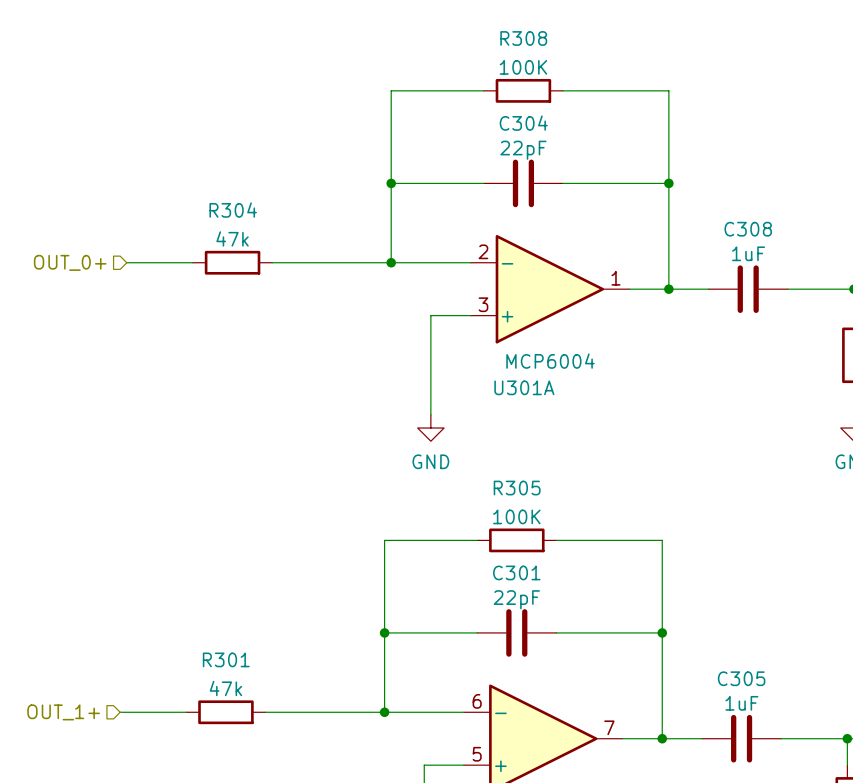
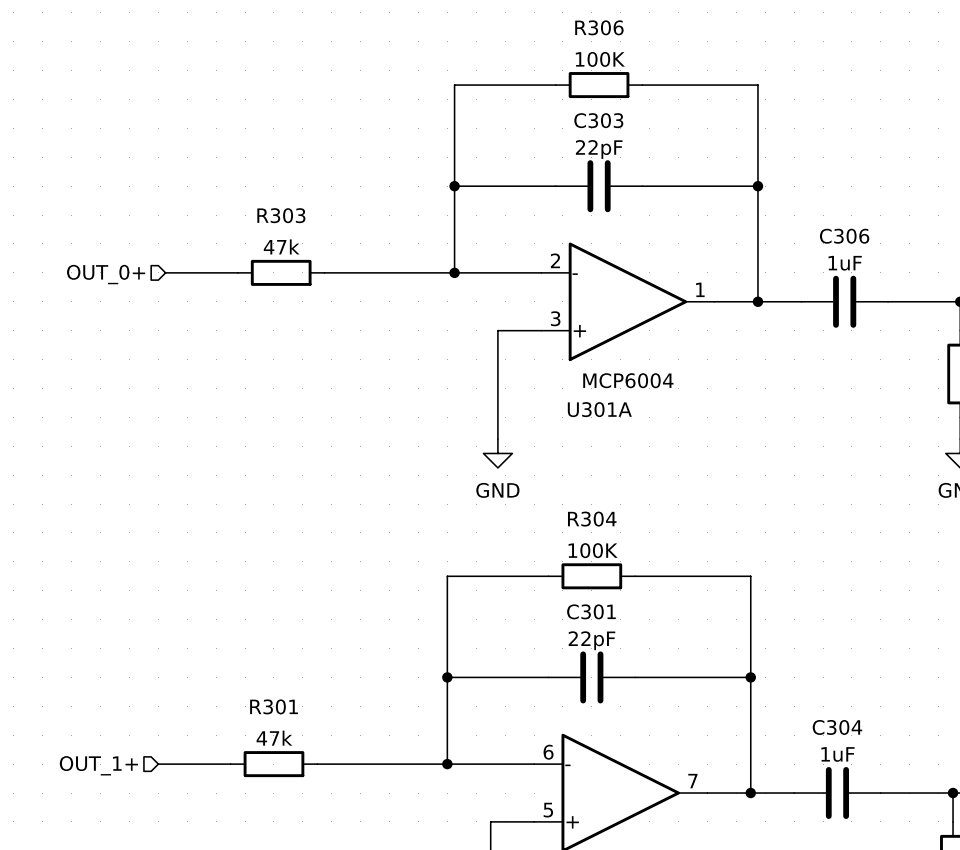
R308 name: R308 (523, 38) -> R306 (599, 27)
C304 name: C304 (523, 123) -> C303 (598, 120)
R304 name: R304 (233, 210) -> R303 (281, 215)
C308 name: C308 (748, 229) -> C306 (844, 236)
R305 name: R305 (517, 488) -> R304 (592, 519)
C305 name: C305 (741, 678) -> C304 (837, 727)

